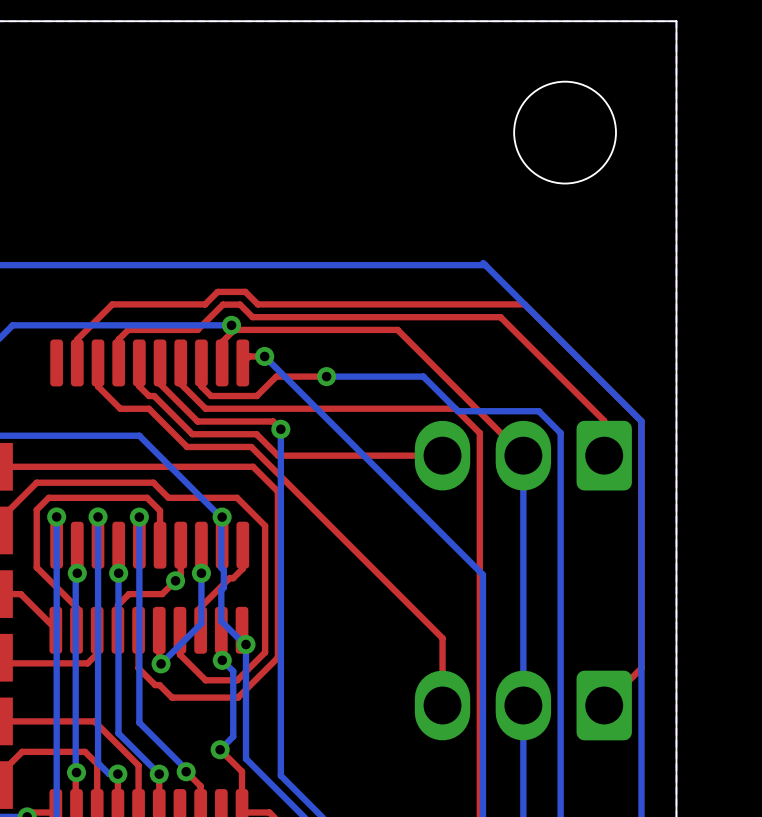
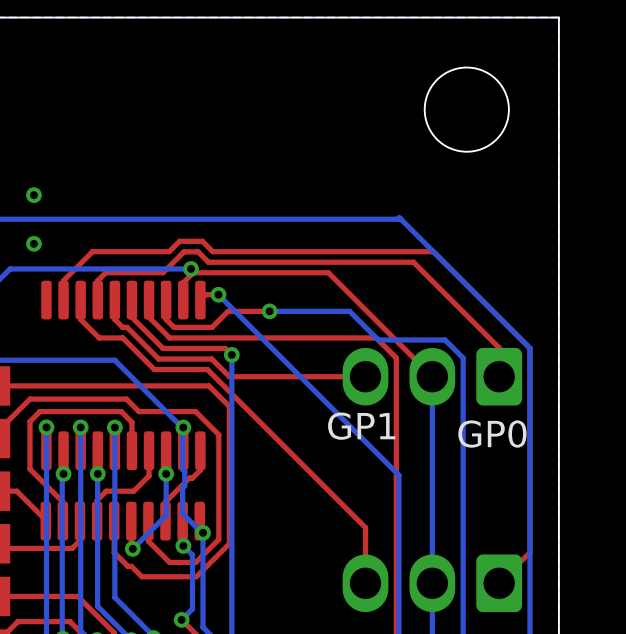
via: none -> (33, 195)
via: none -> (33, 243)
text: none -> GP1 (361, 426)
text: none -> GP0 (492, 434)
via: (175, 580) -> none

